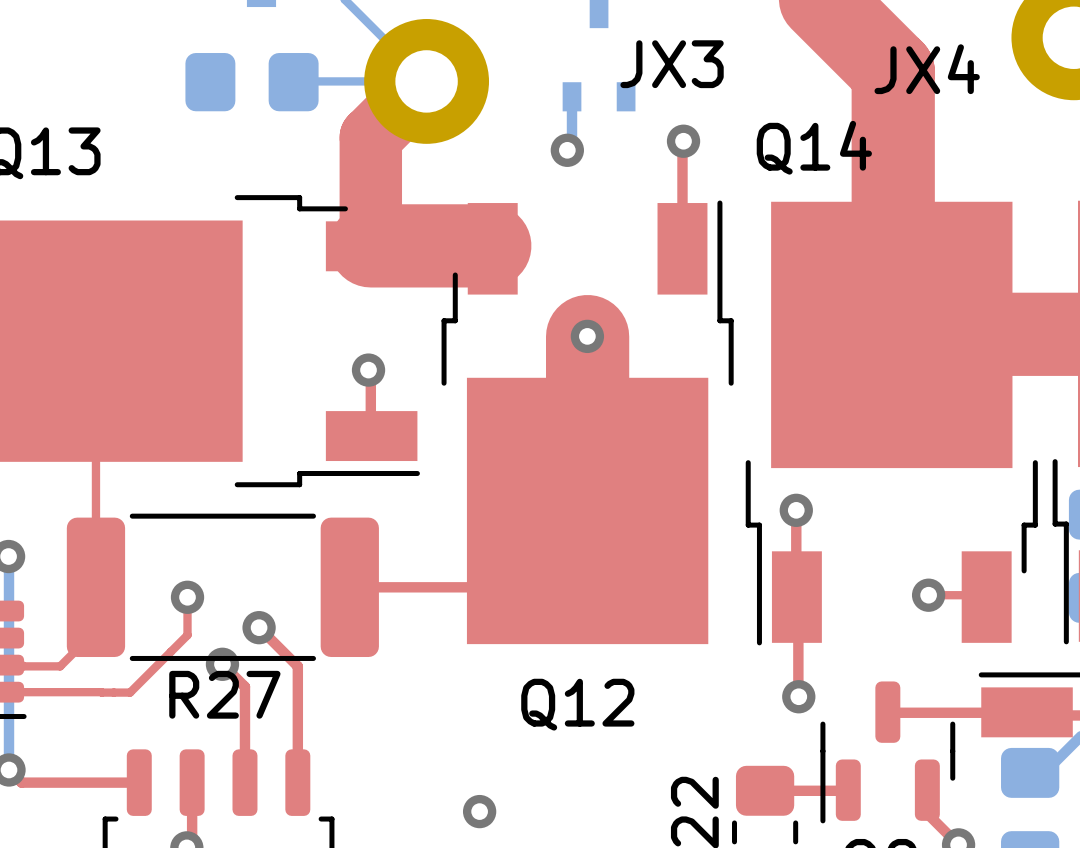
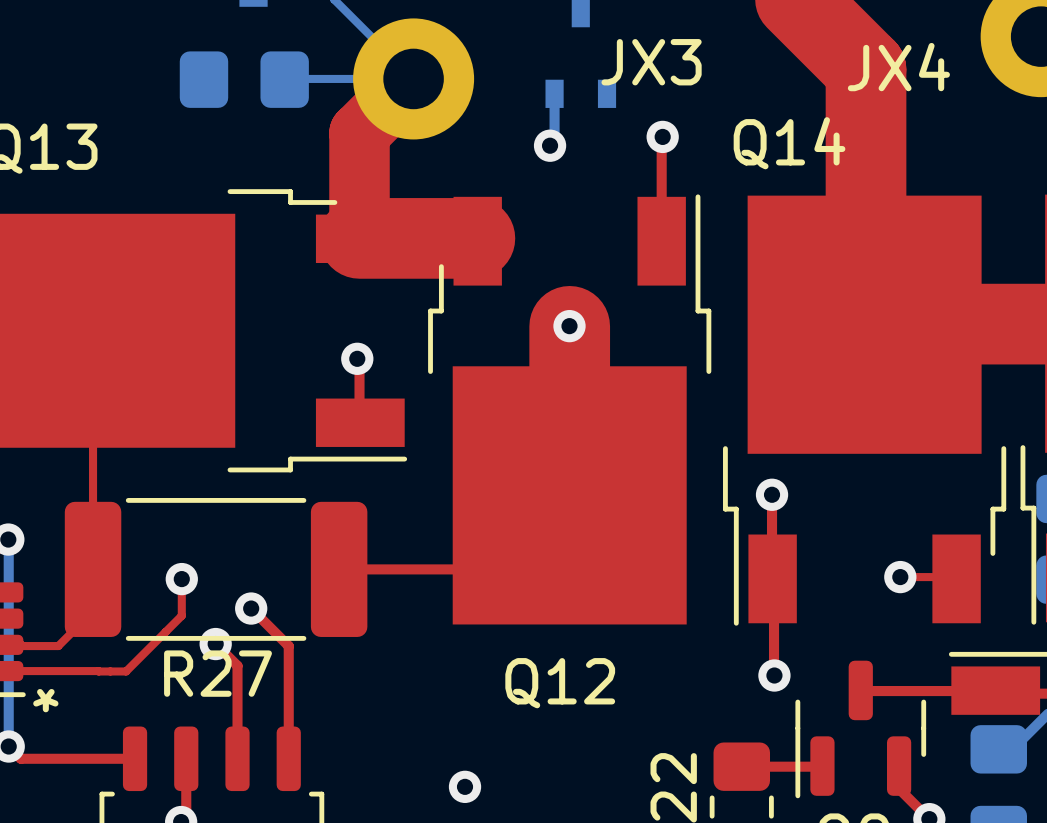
part text: none -> * (45, 700)

